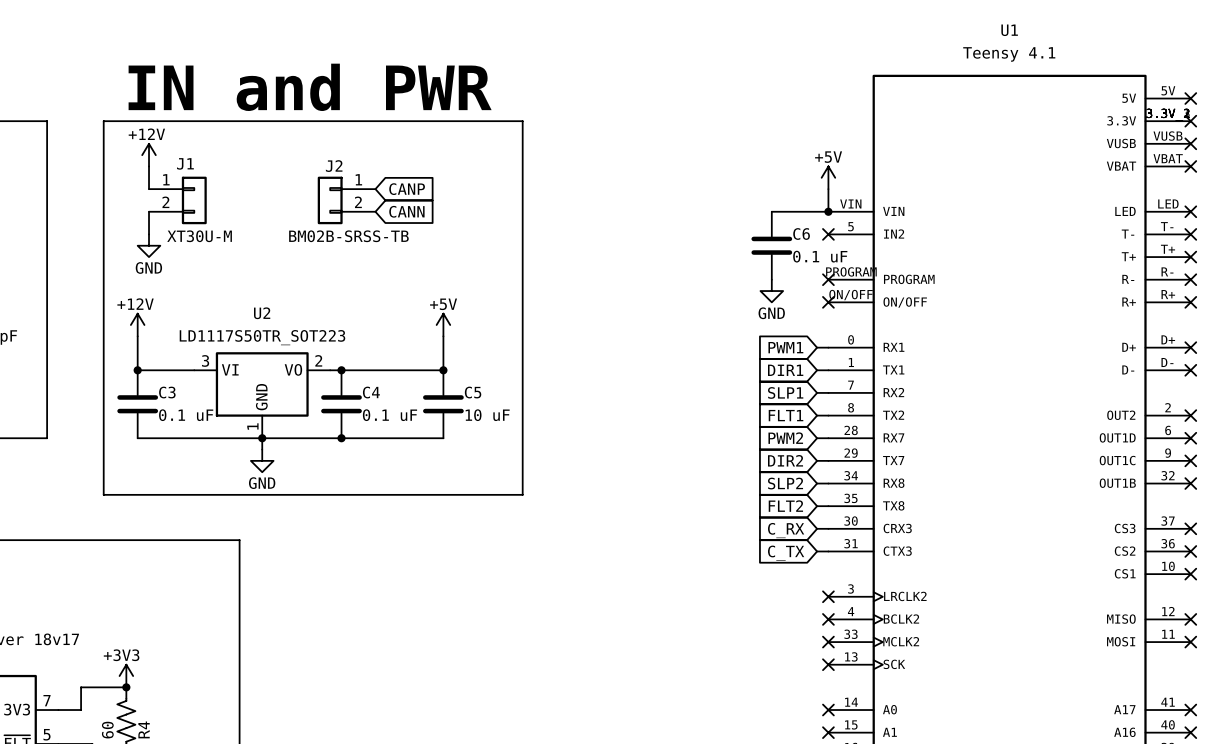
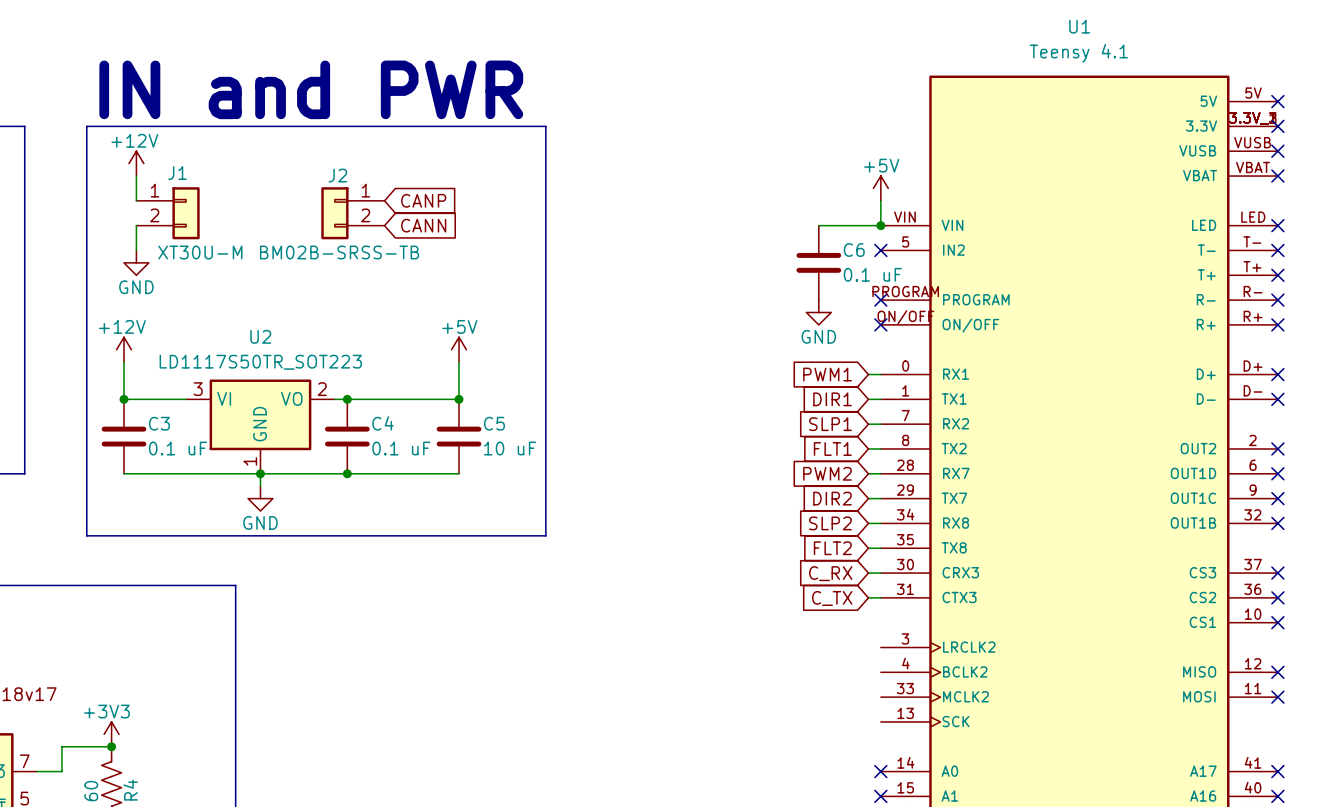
no-connect mark: (828, 596) -> none
no-connect mark: (828, 619) -> none
no-connect mark: (828, 642) -> none
no-connect mark: (828, 664) -> none

